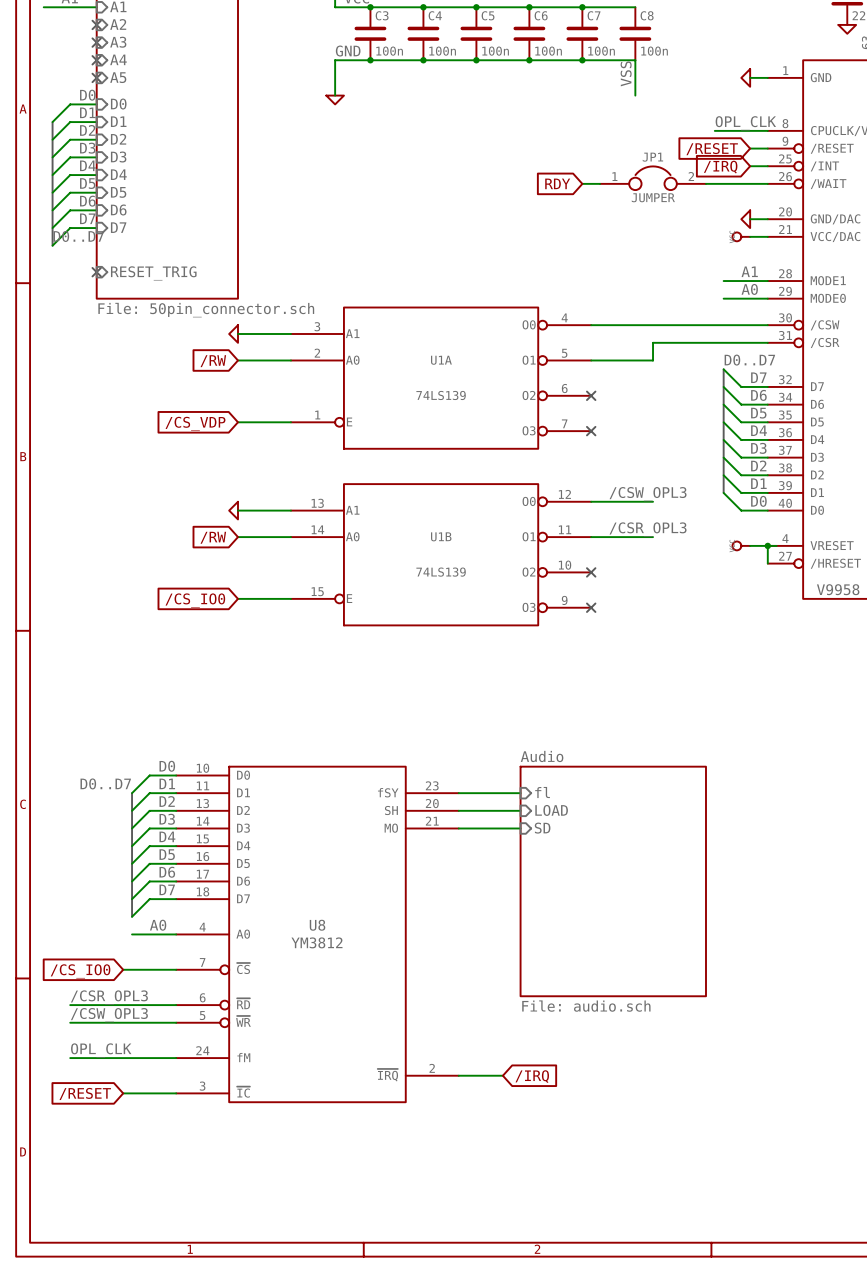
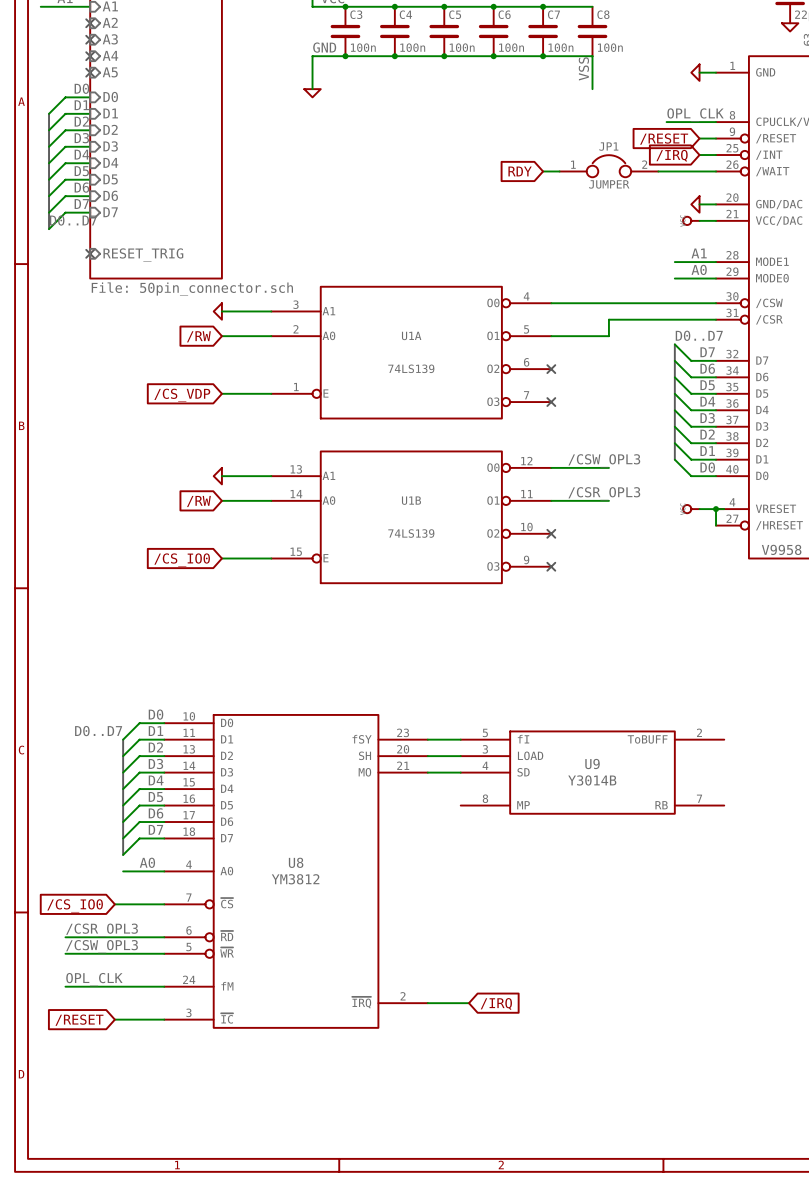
sheet pin: fl (542, 792) -> none
sheet pin: LOAD (551, 810) -> none
sheet pin: SD (542, 828) -> none
U9: none -> Y3014B (592, 772)
sheet Audio: File: audio.sch (613, 881) -> none

